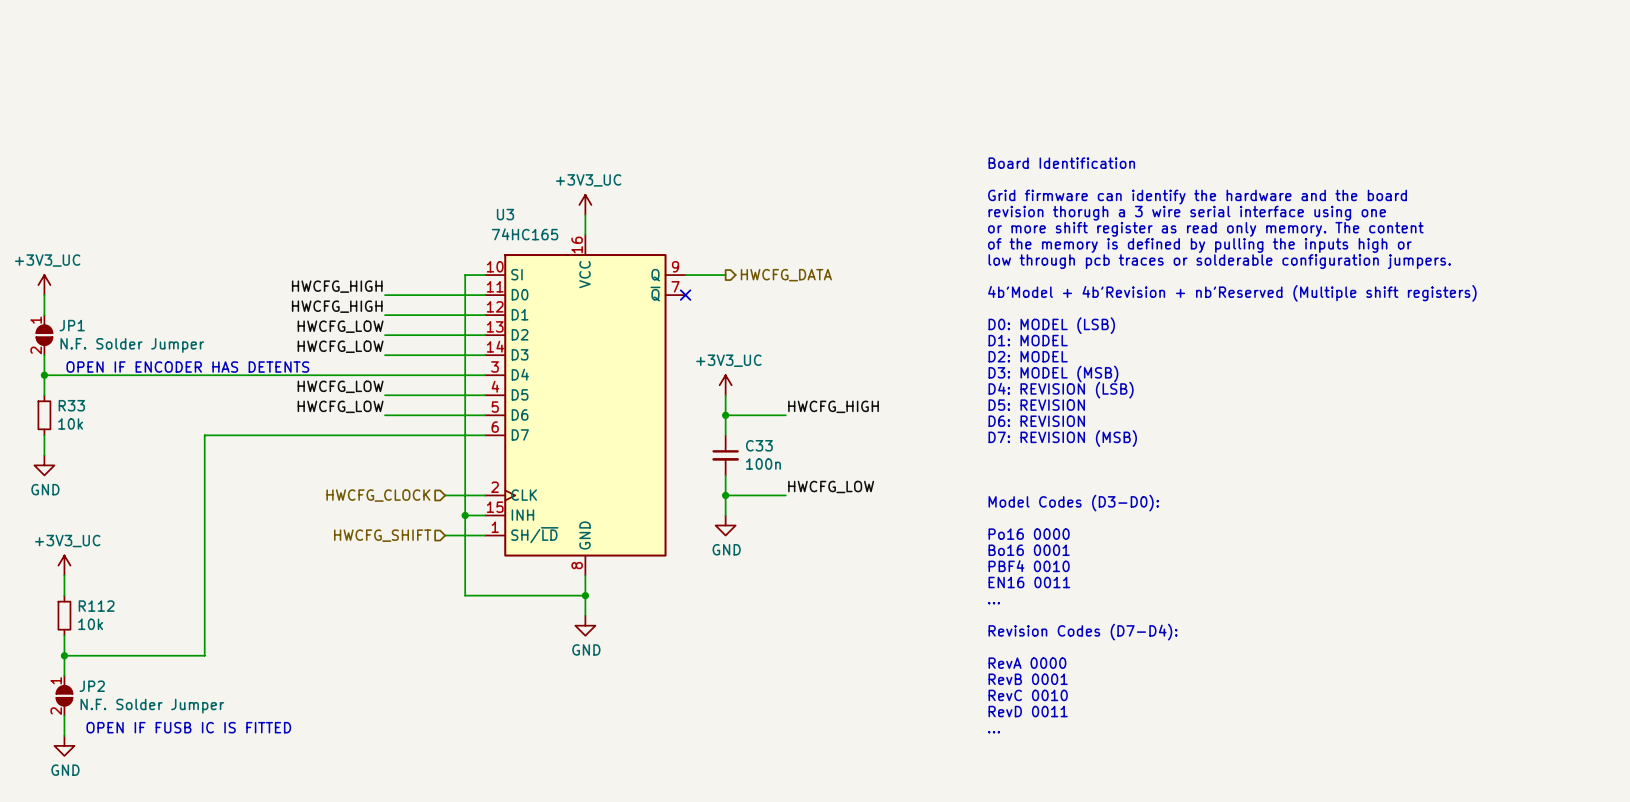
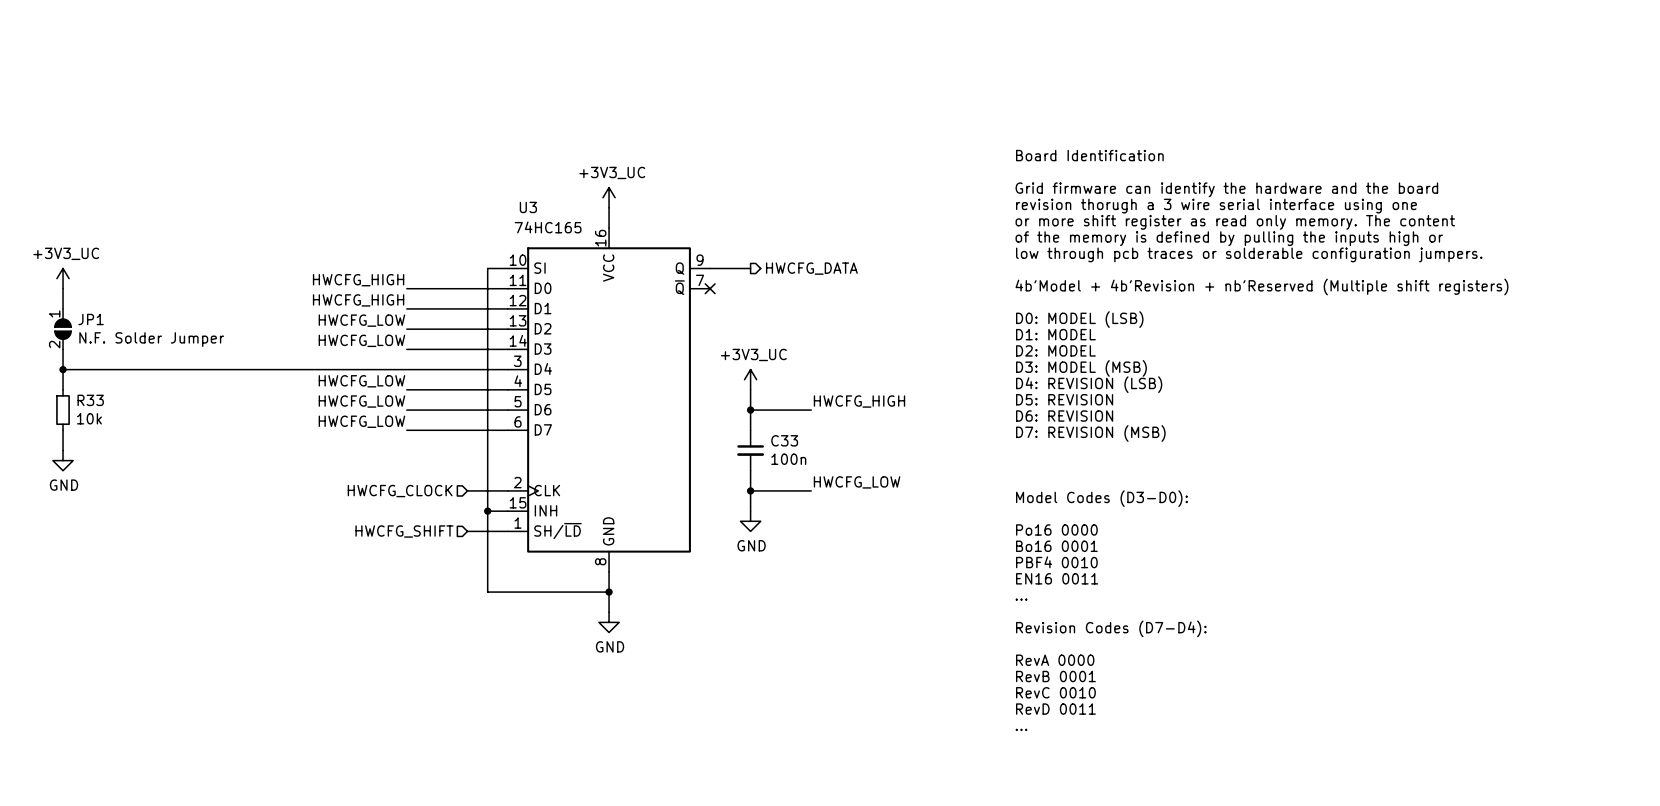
text: OPEN IF ENCODER HAS DETENTS (187, 367) -> none
label: none -> HWCFG_LOW (361, 421)
wire: (385, 435) (204, 435) (204, 655) (64, 655) -> none
power symbol: +3V3_UC (64, 565) -> none
wire: (64, 575) (64, 595) -> none
R112: 10k (64, 615) -> none
wire: (64, 635) (64, 675) -> none
junction: (64, 655) -> none
JP2: N.F. Solder Jumper (64, 695) -> none
wire: (64, 715) (64, 735) -> none
text: OPEN IF FUSB IC IS FITTED (188, 727) -> none
power symbol: GND (64, 745) -> none

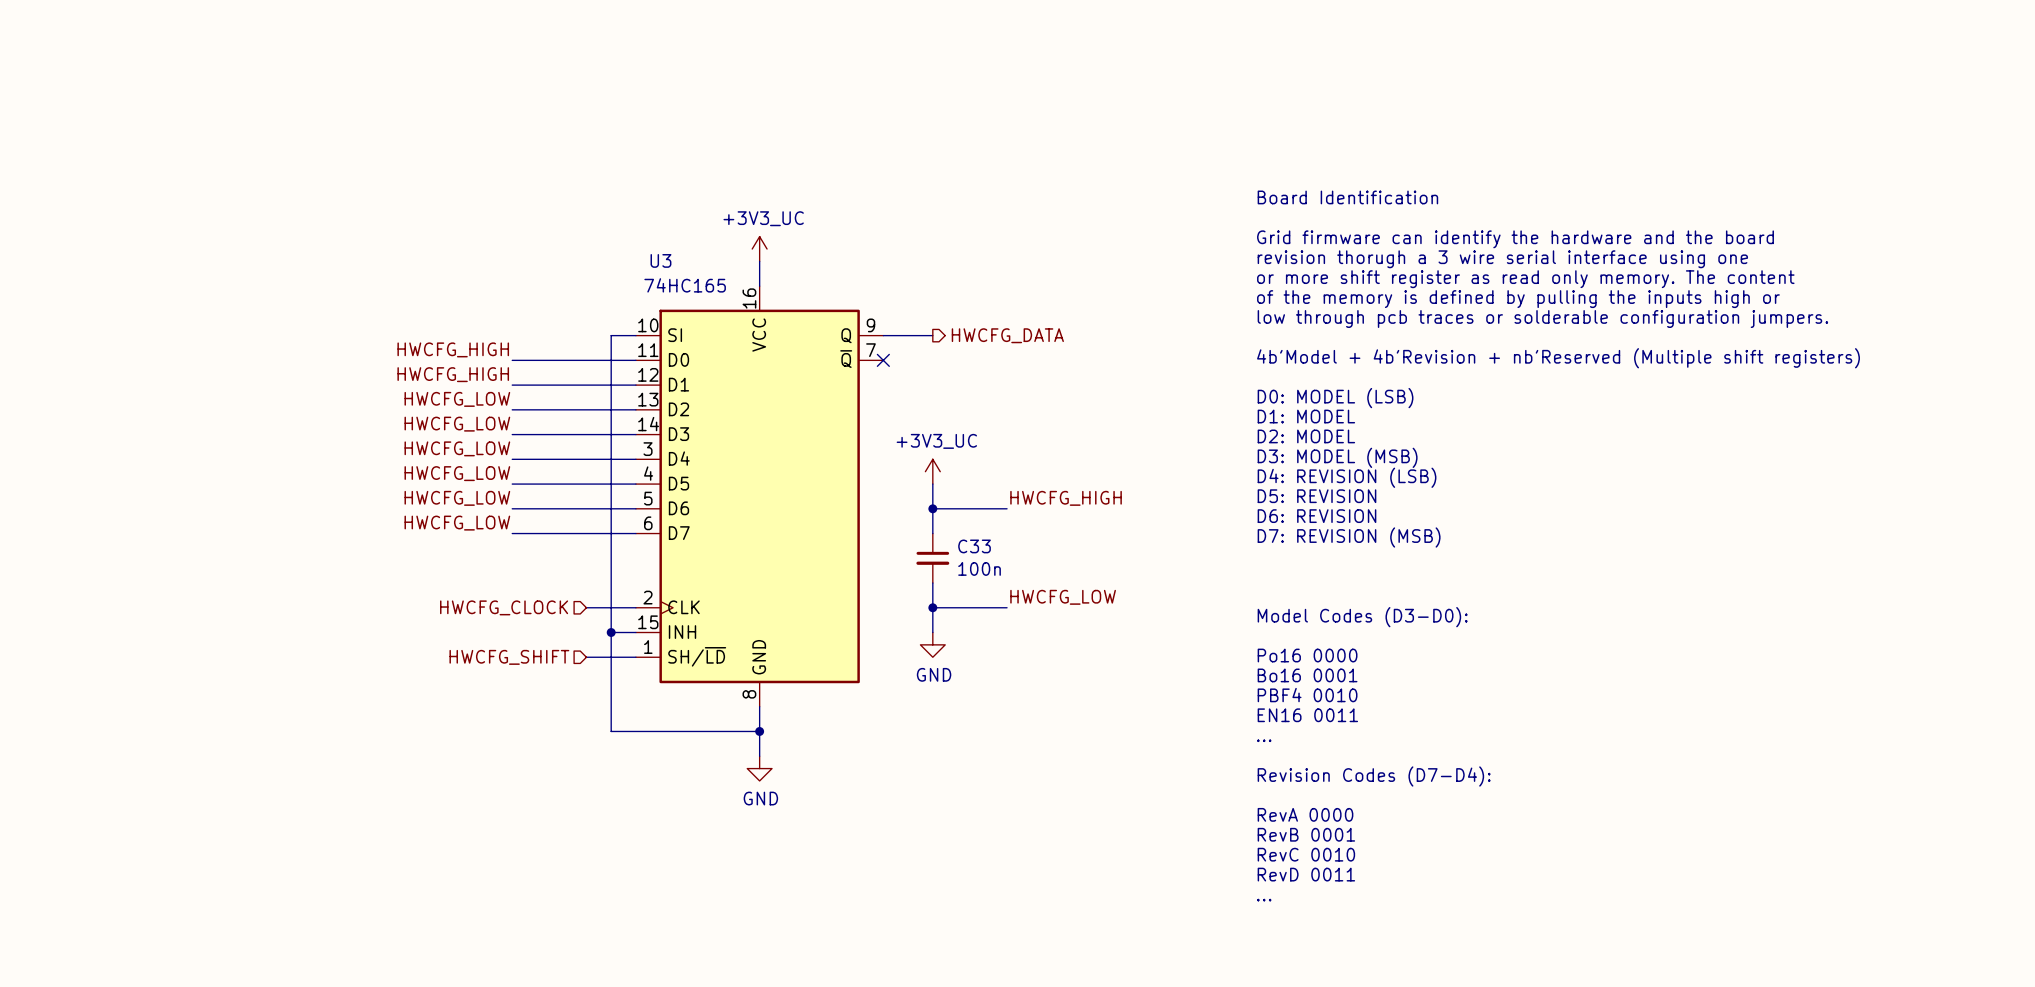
power symbol: +3V3_UC (63, 278) -> none
wire: (63, 288) (63, 308) -> none
JP1: N.F. Solder Jumper (63, 329) -> none
wire: (63, 349) (63, 389) -> none
label: none -> HWCFG_LOW (457, 448)
wire: (63, 369) (406, 369) -> none
junction: (63, 369) -> none
R33: 10k (63, 410) -> none
wire: (63, 430) (63, 450) -> none
power symbol: GND (63, 460) -> none

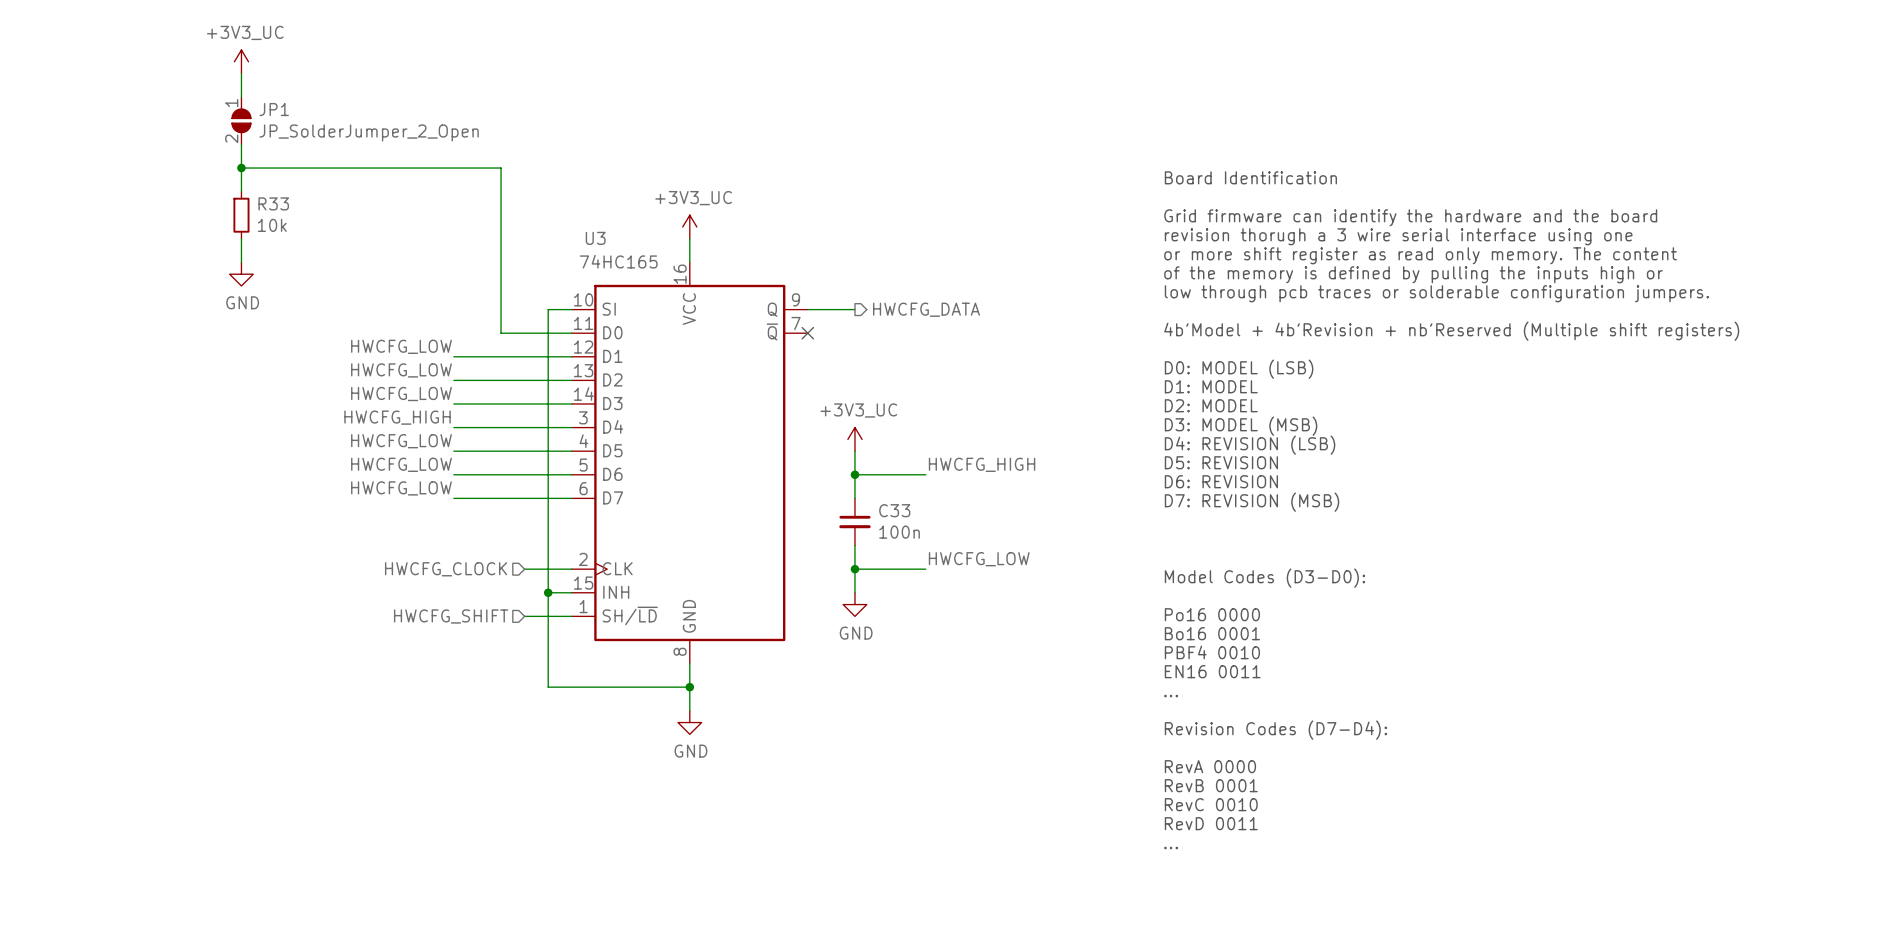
power symbol: none -> +3V3_UC (241, 61)
wire: none -> (241, 73) (241, 97)
JP1: none -> JP_SolderJumper_2_Open (241, 120)
wire: none -> (241, 144) (241, 191)
junction: none -> (241, 168)
R33: none -> 10k (241, 215)
wire: none -> (241, 238) (241, 262)
power symbol: none -> GND (241, 274)
label: HWCFG_HIGH (453, 349) -> none
wire: (512, 360) (561, 360) -> (241, 168) (501, 168) (501, 333)
label: HWCFG_HIGH (453, 374) -> HWCFG_LOW (401, 346)
label: HWCFG_LOW (457, 448) -> HWCFG_HIGH (397, 417)

